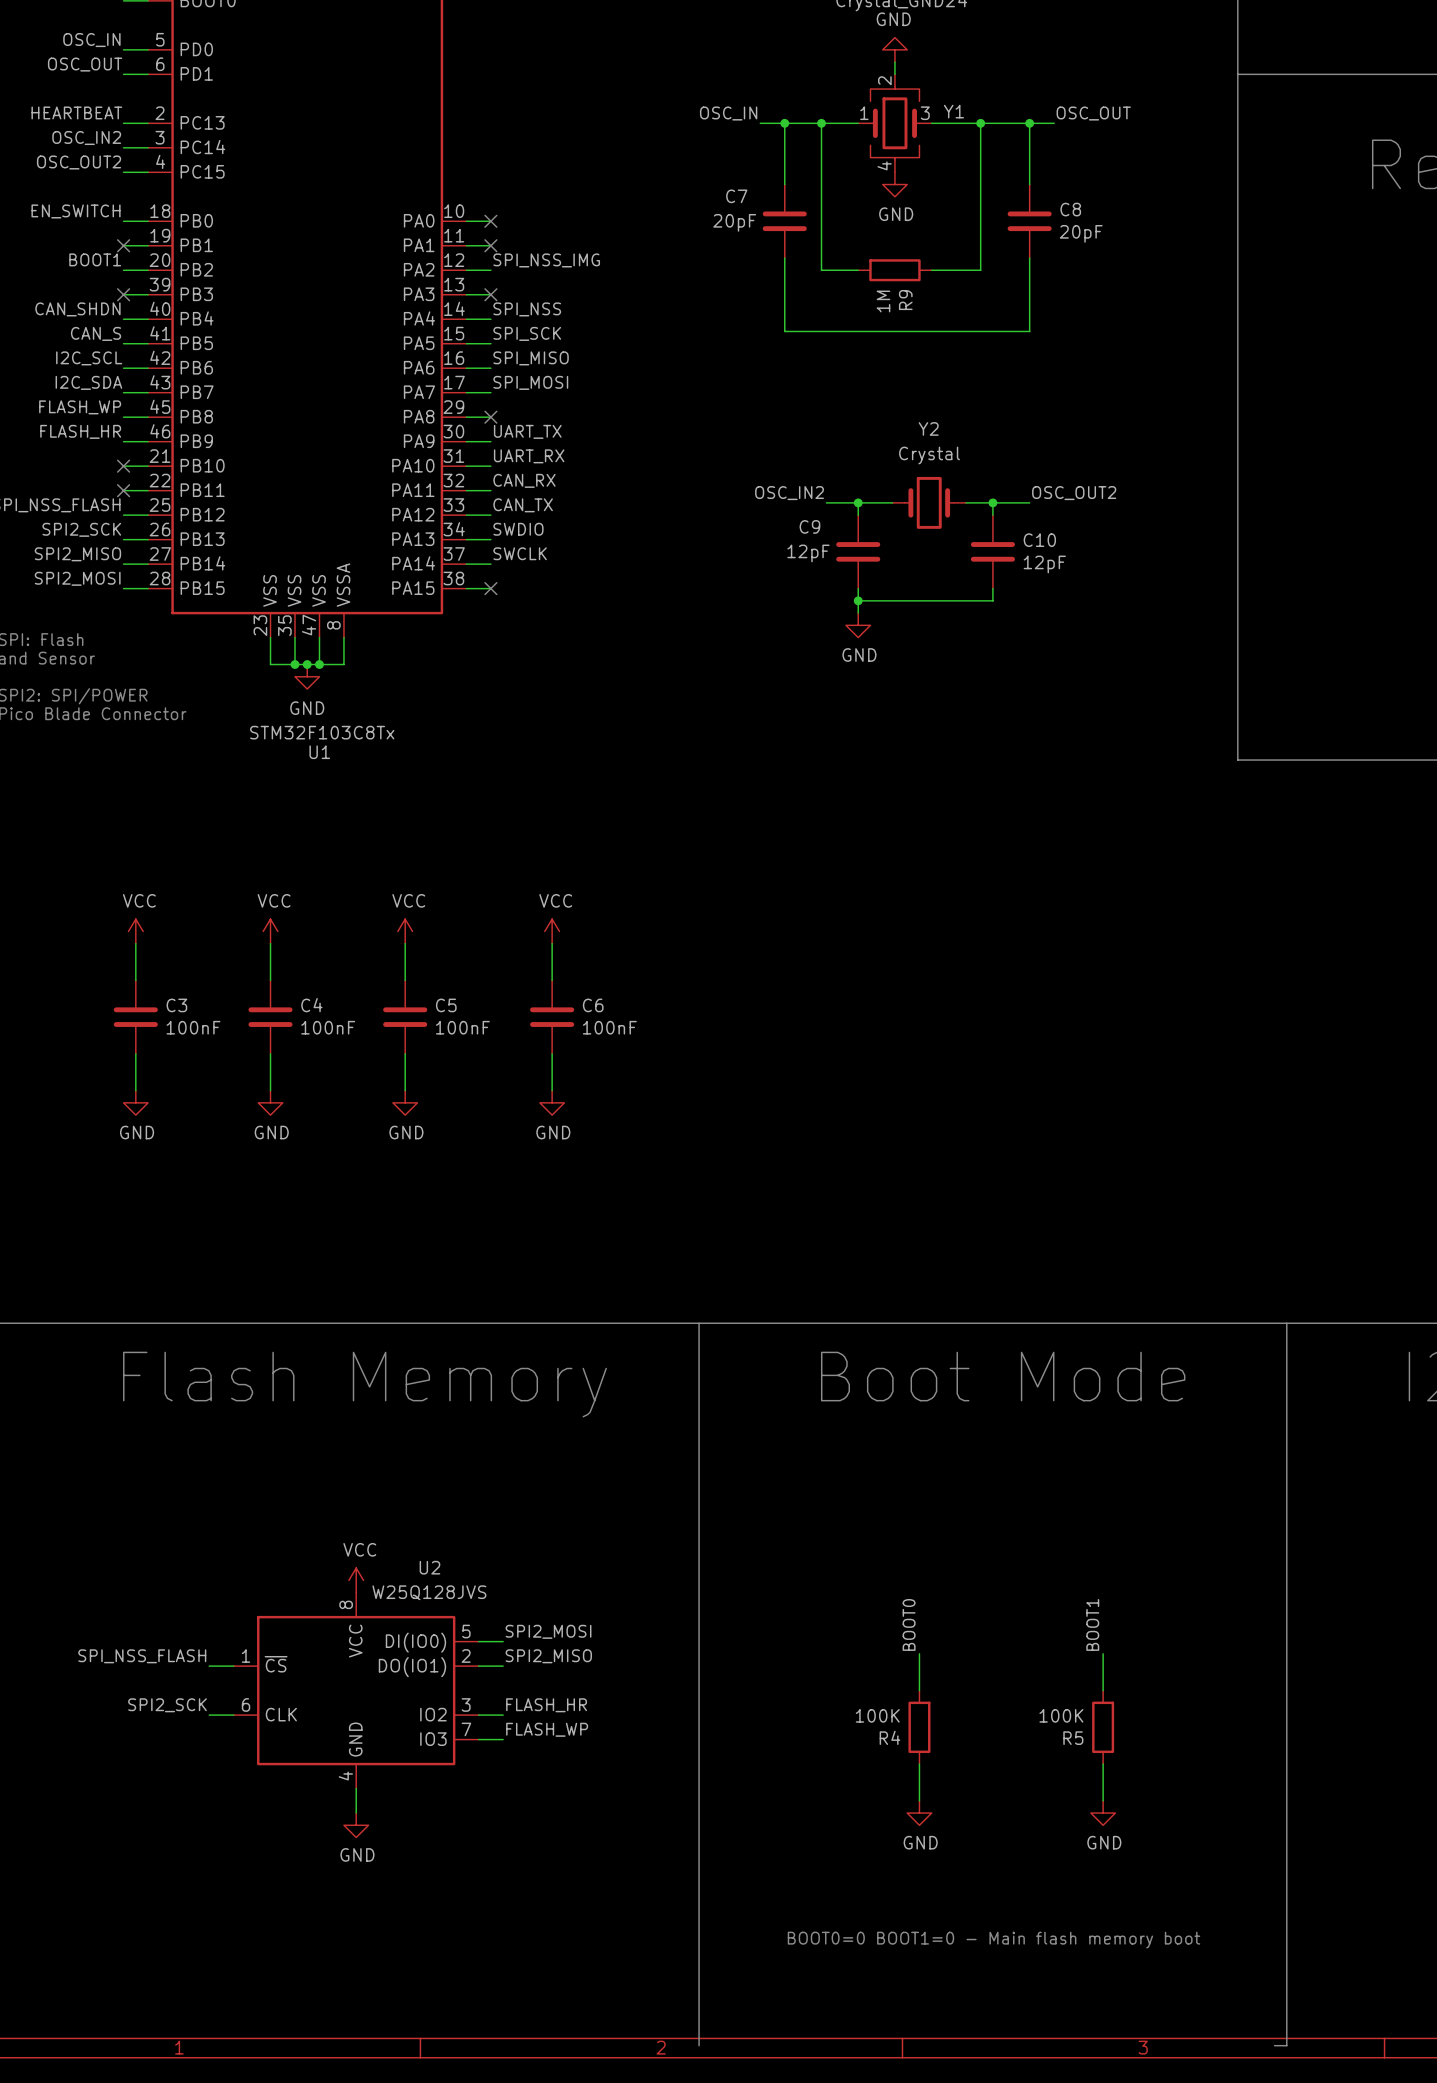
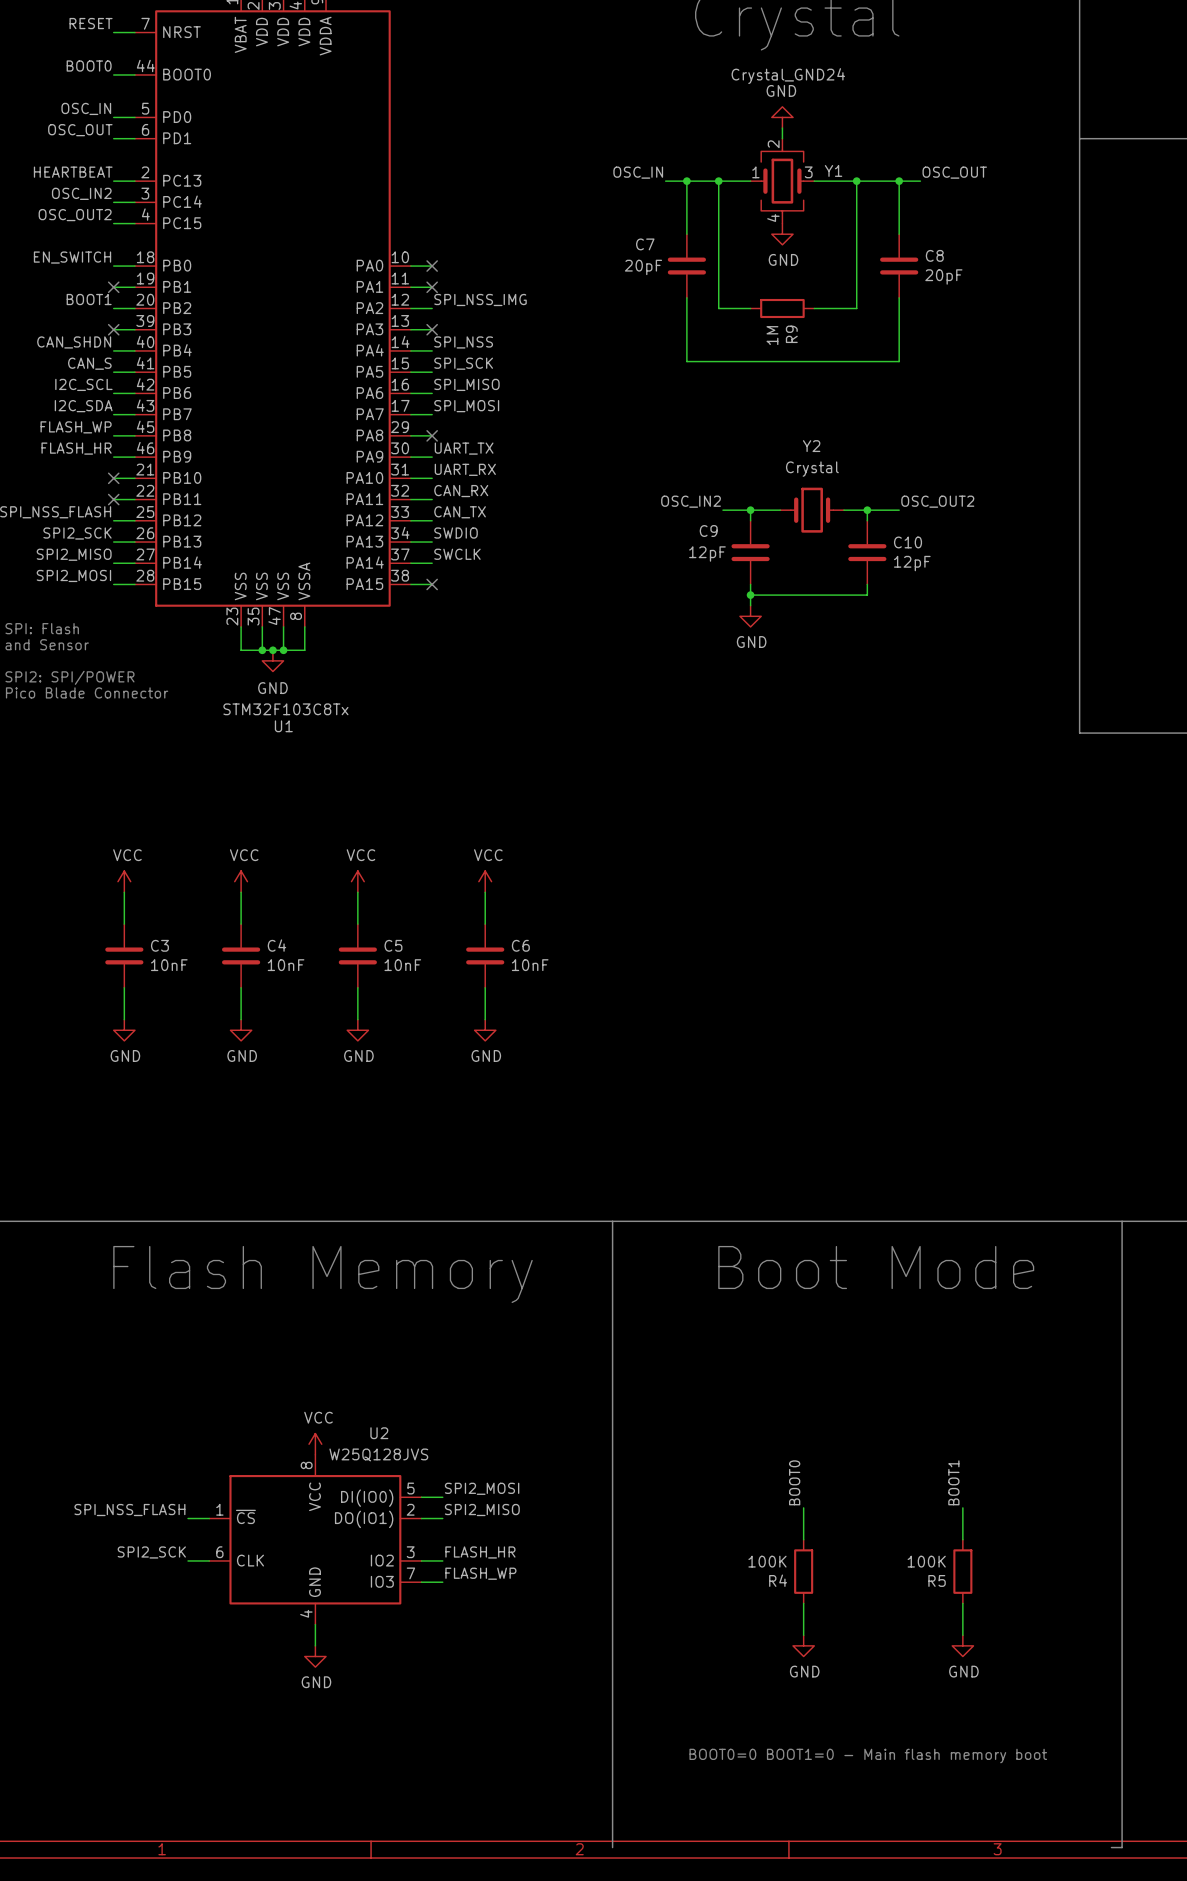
C3 value: 100nF (193, 1027) -> 10nF (169, 965)
C4 value: 100nF (328, 1027) -> 10nF (286, 965)
C5 value: 100nF (462, 1027) -> 10nF (402, 965)
C6 value: 100nF (609, 1027) -> 10nF (530, 965)

